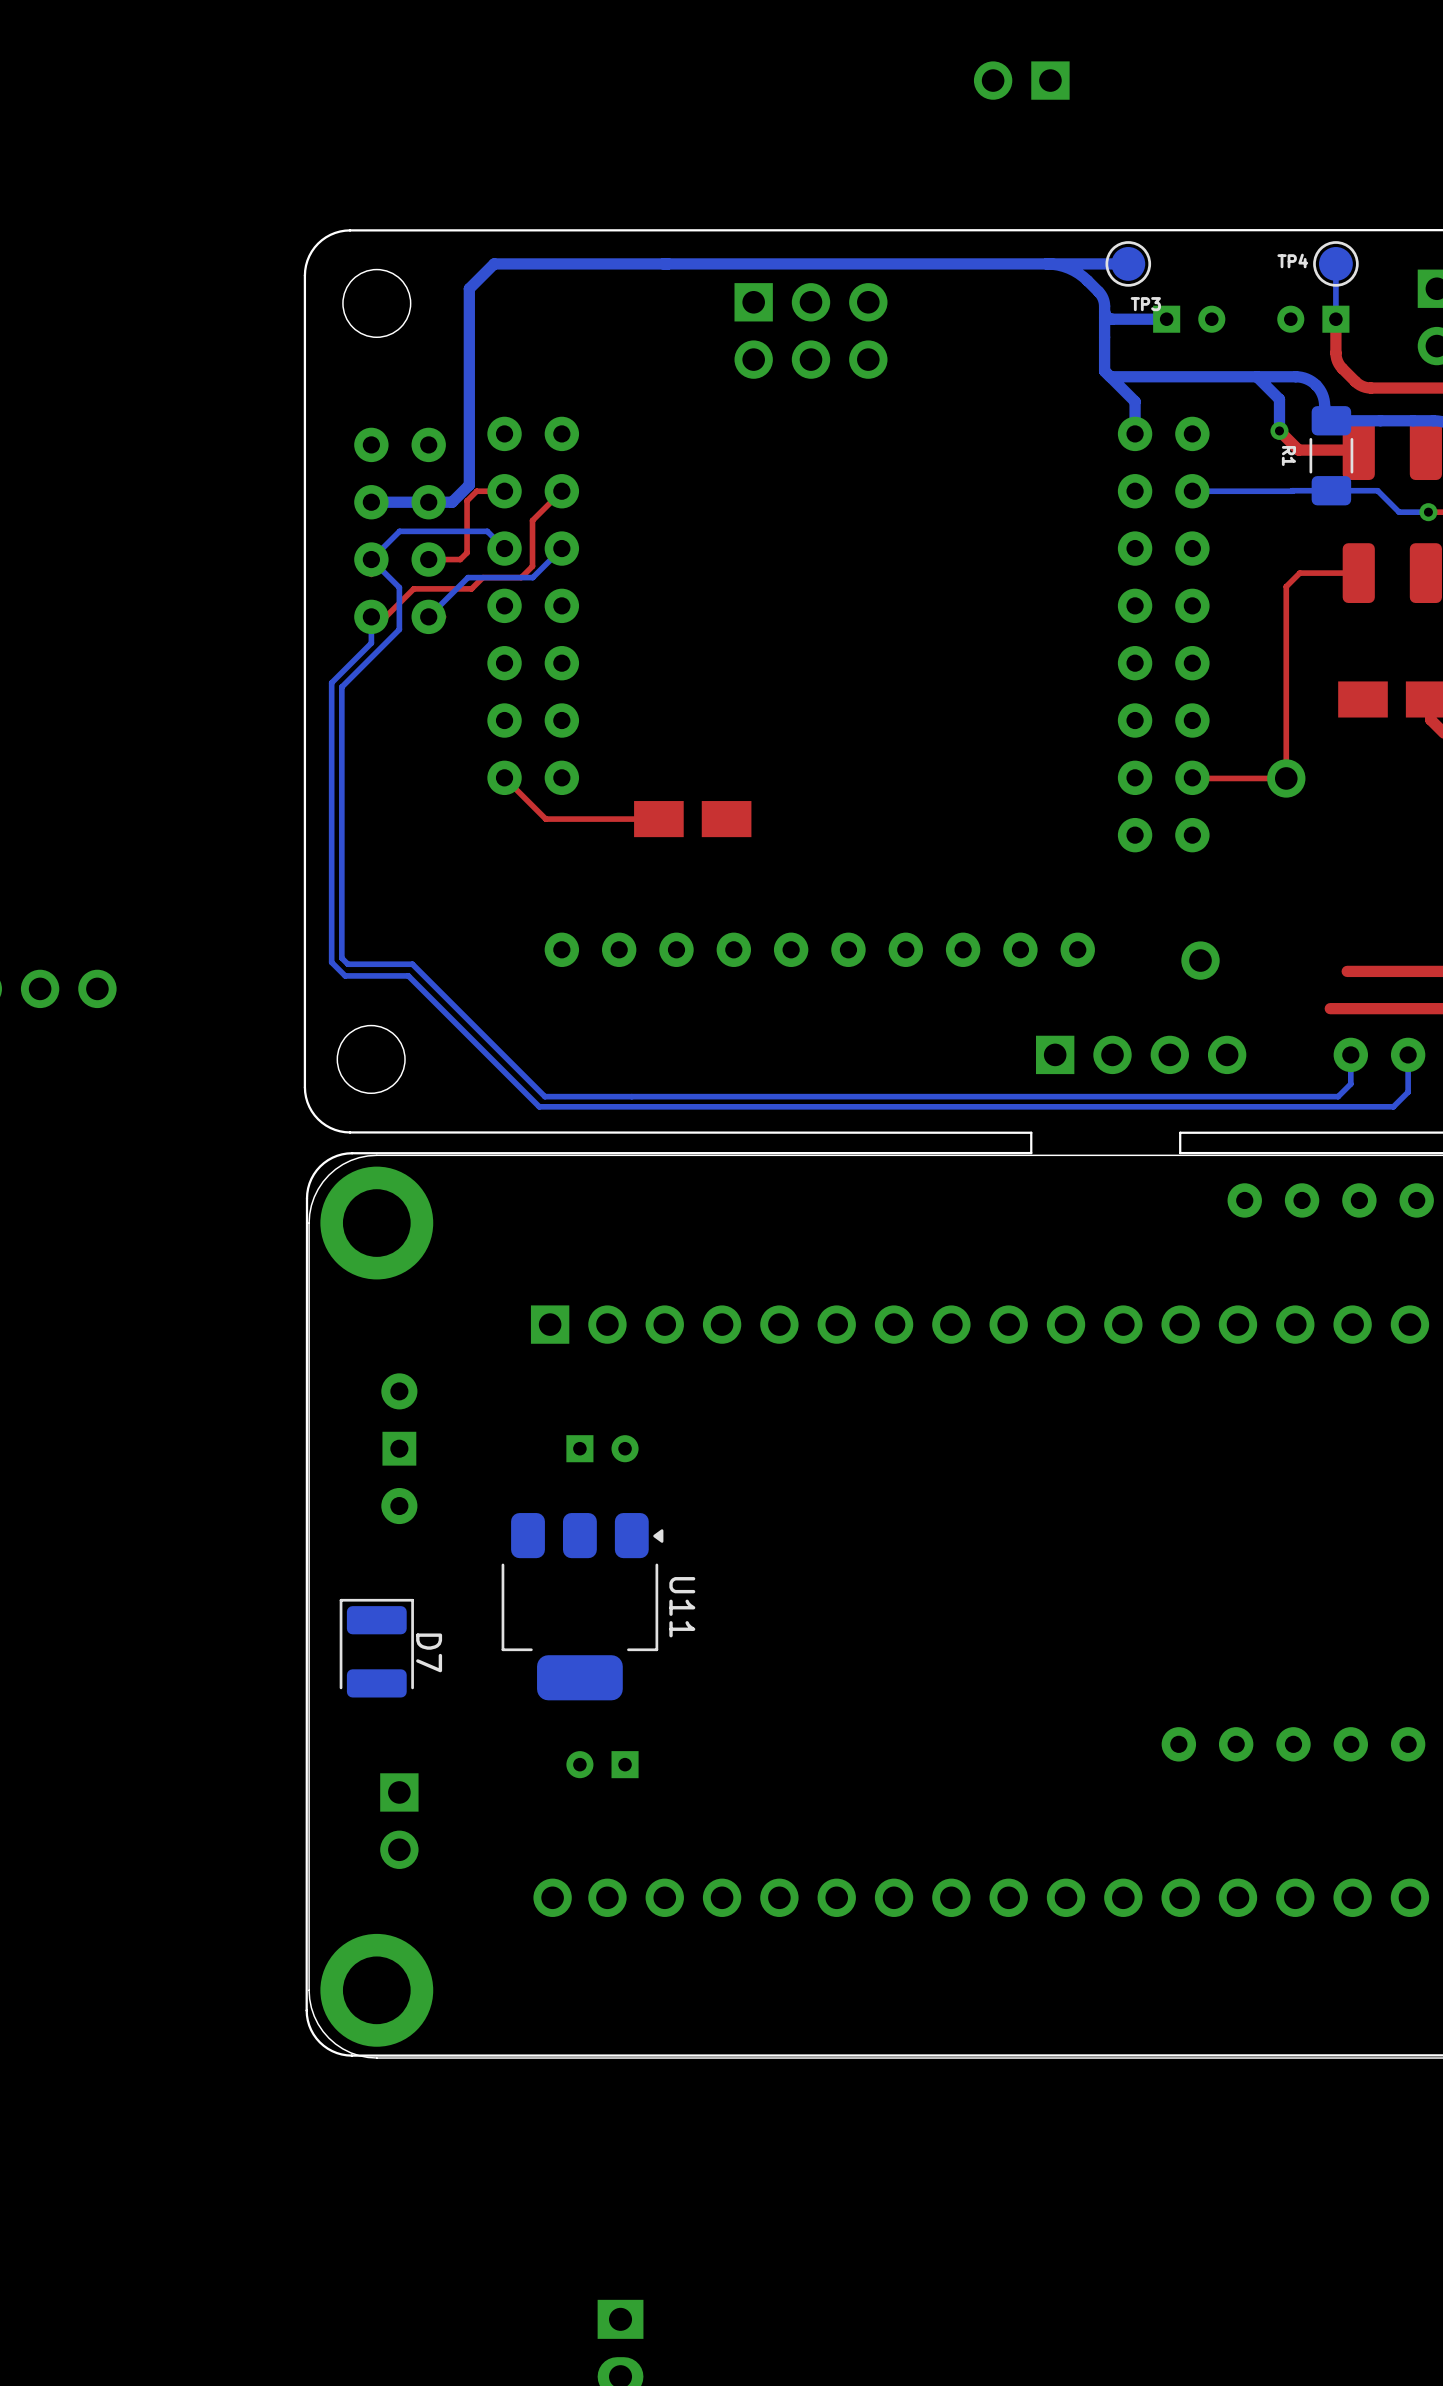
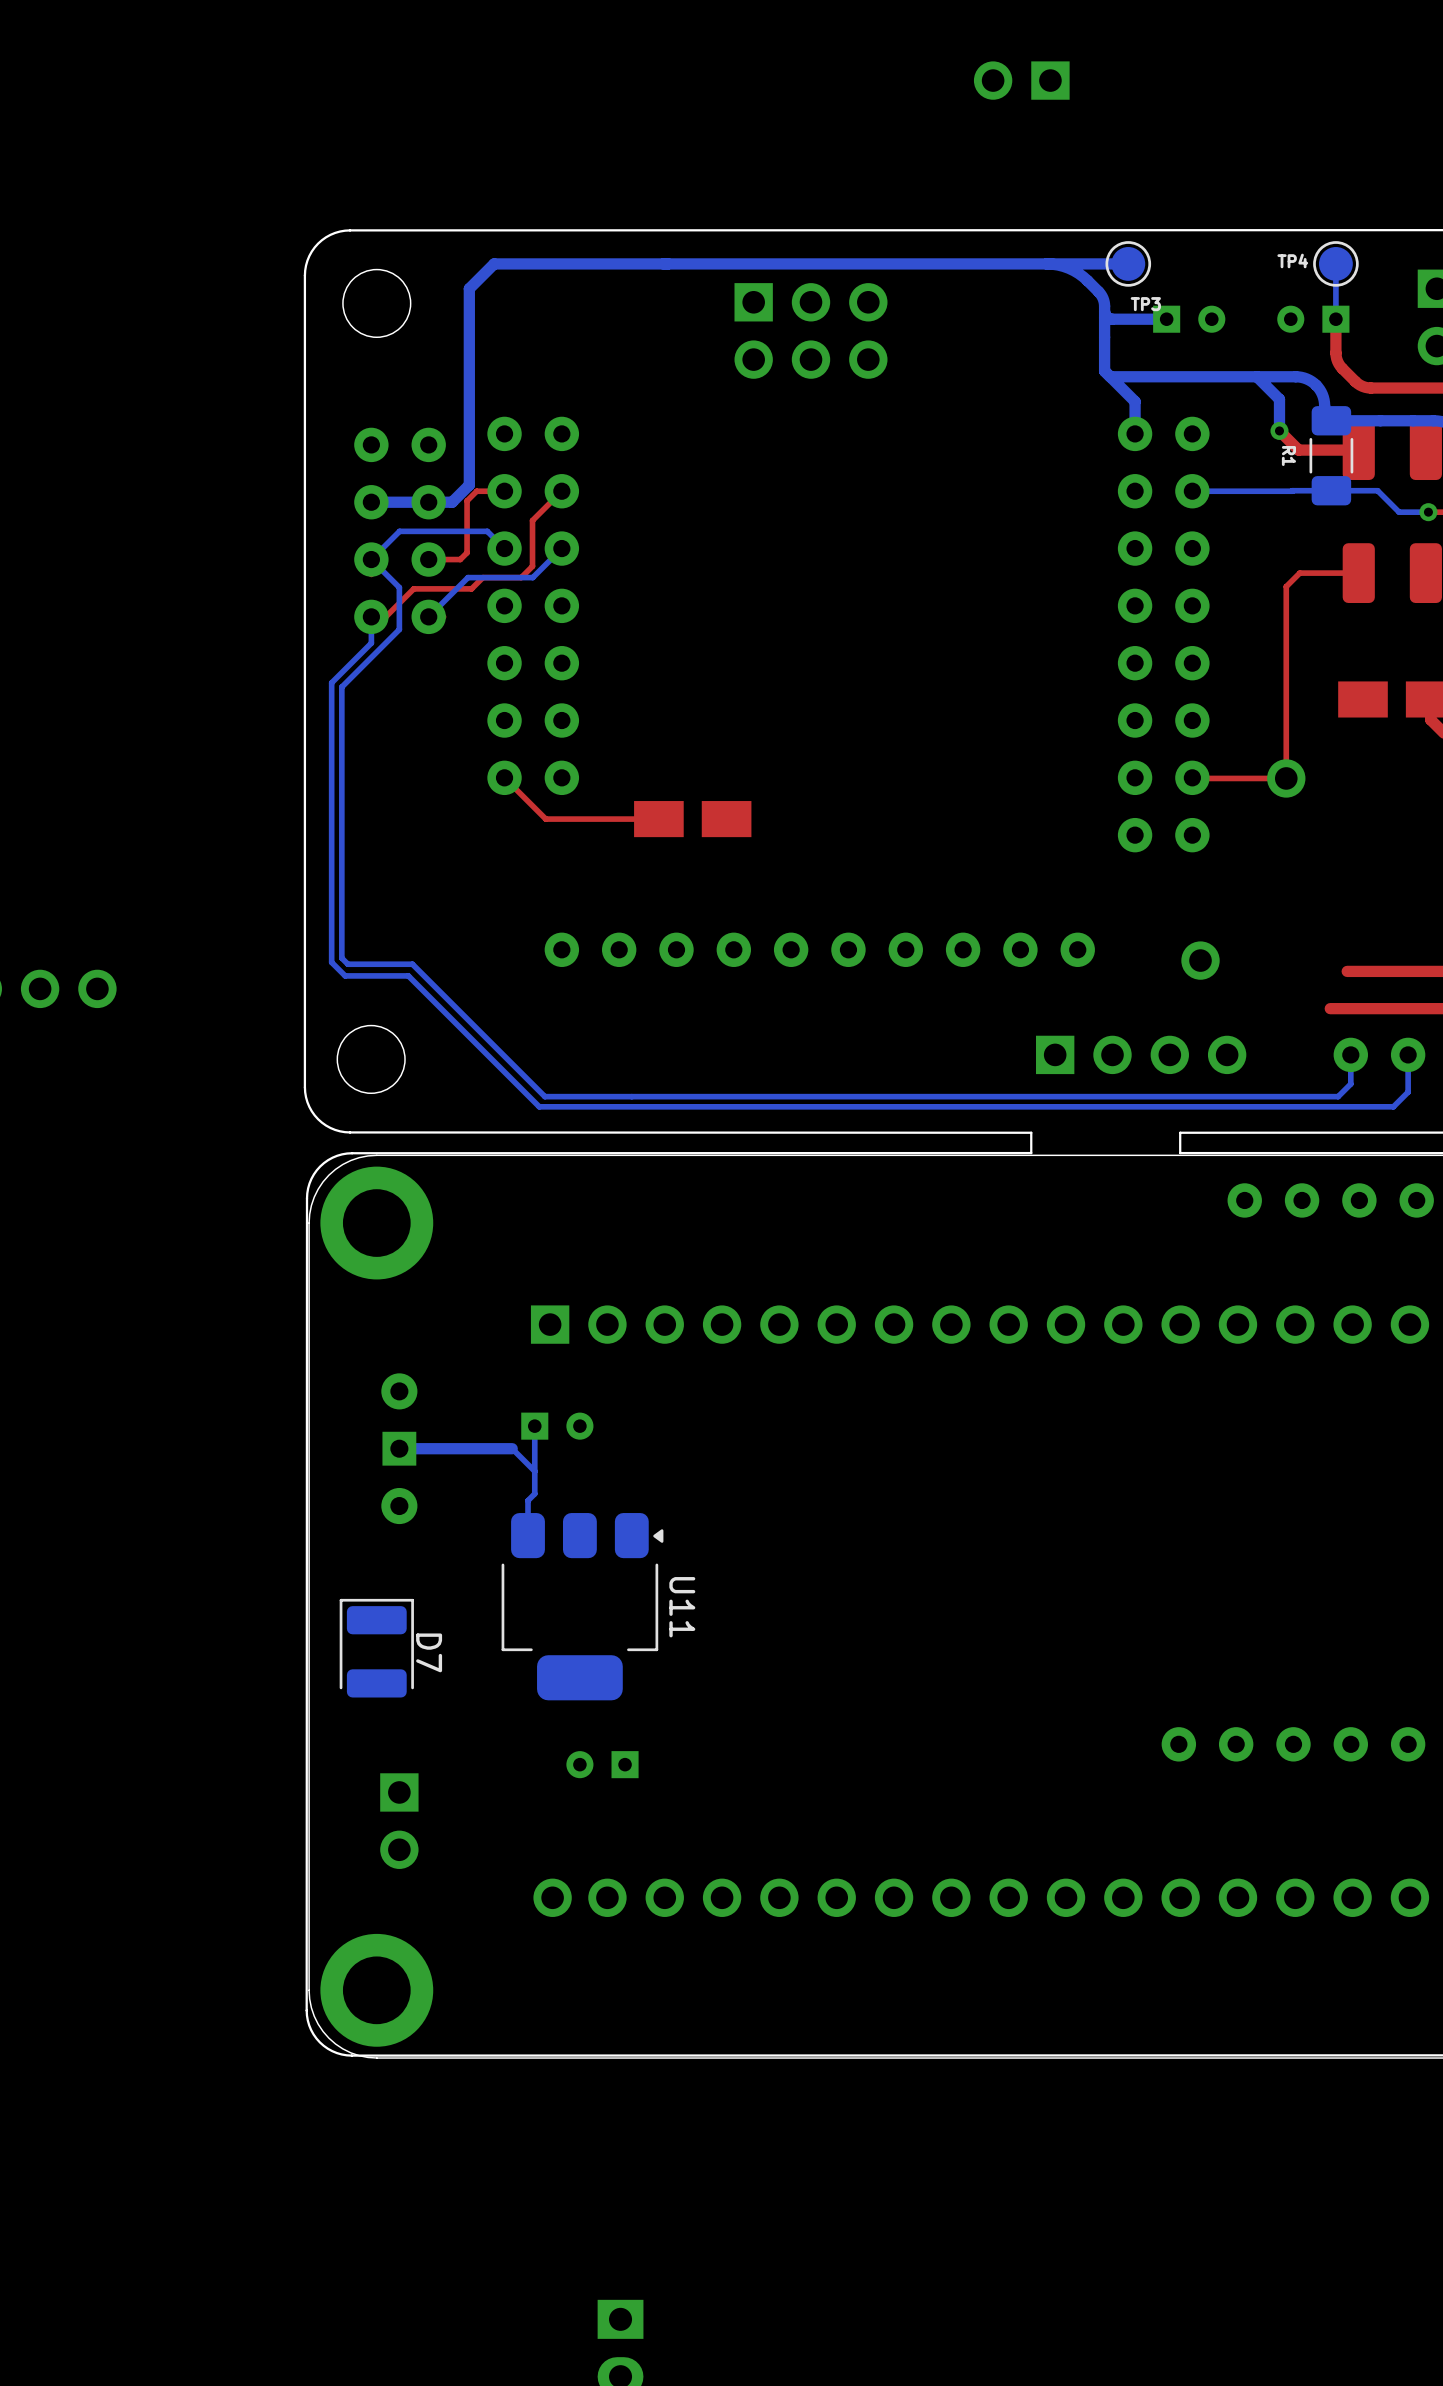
bottom track: none -> (528, 1432) (534, 1426) (534, 1493) (528, 1500) (528, 1535)
bottom track: none -> (399, 1448) (512, 1448) (534, 1471)
part position: (602, 1448) -> (557, 1426)

